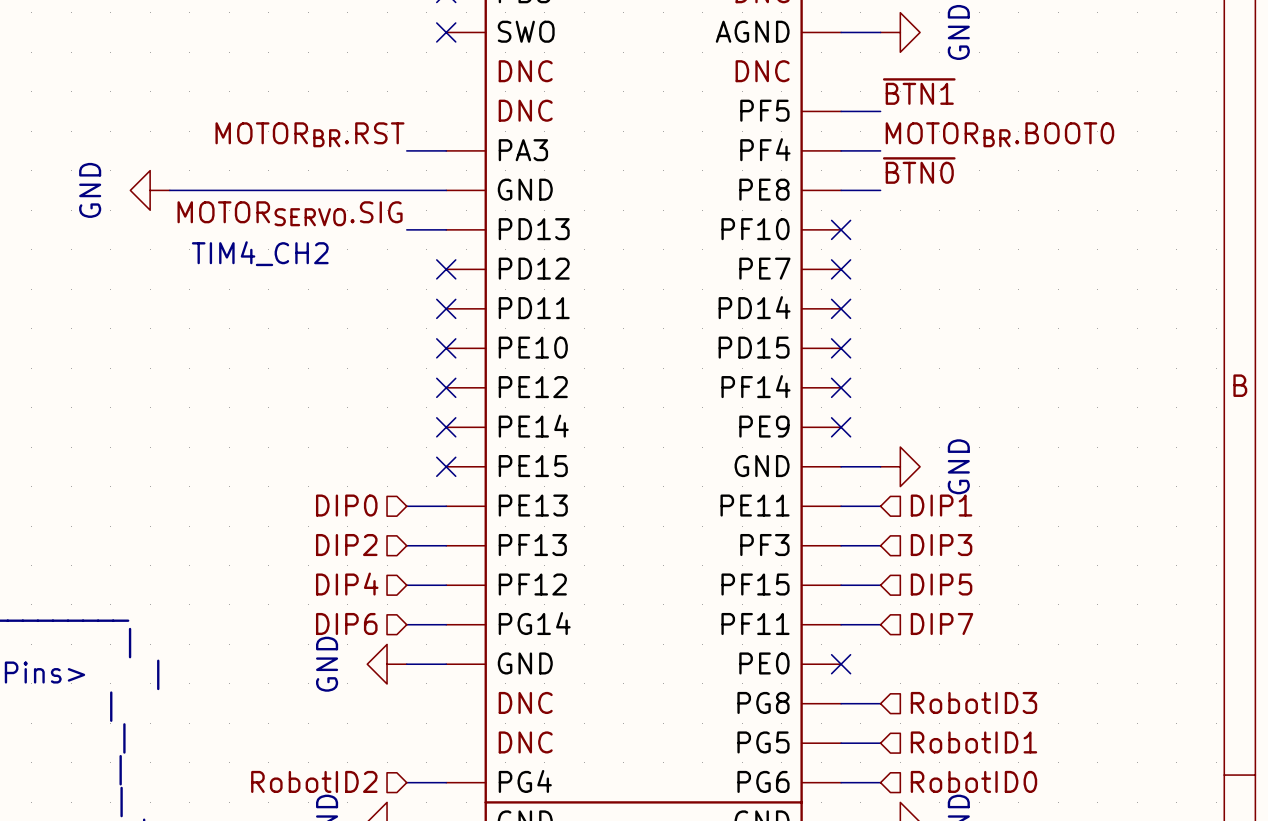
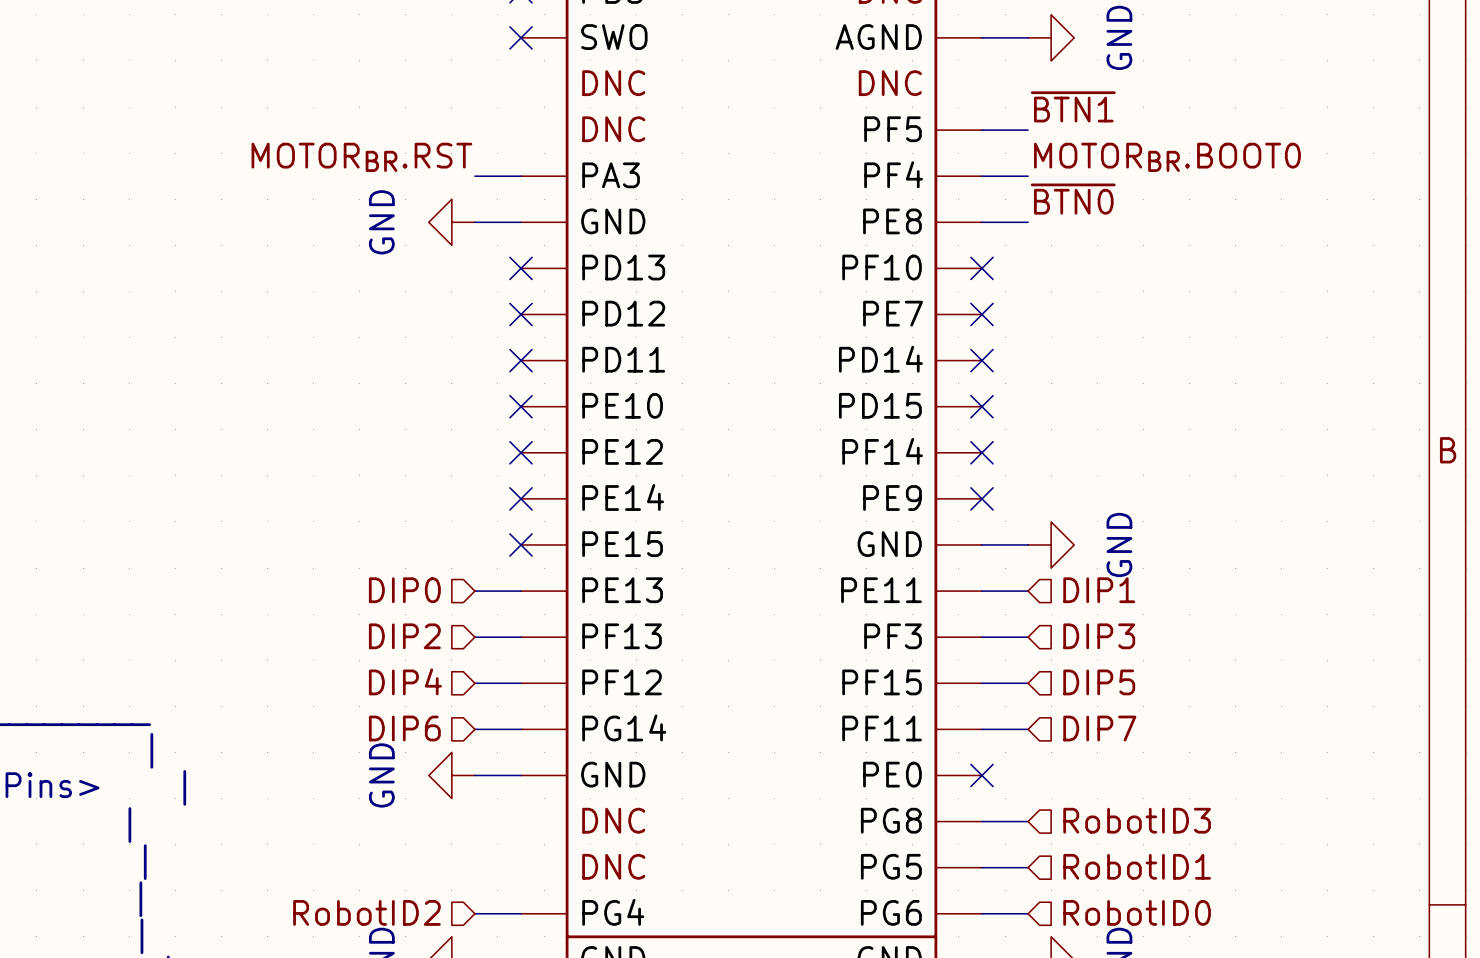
power symbol position: GND (150, 190) -> GND (451, 222)
wire: (169, 190) (406, 190) -> none
label: MOTORSERVO.SIG (290, 213) -> none
wire: (406, 229) (446, 229) -> none
no-connect mark: none -> (521, 268)
text: TIM4_CH2 (260, 253) -> none

